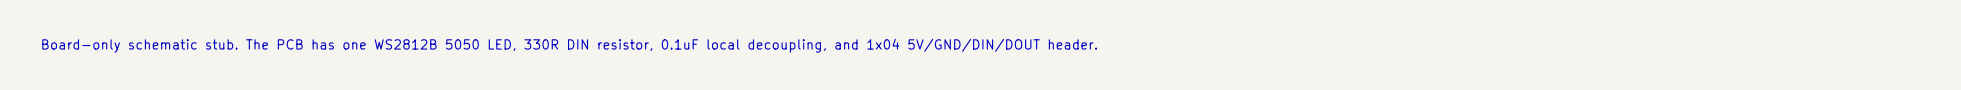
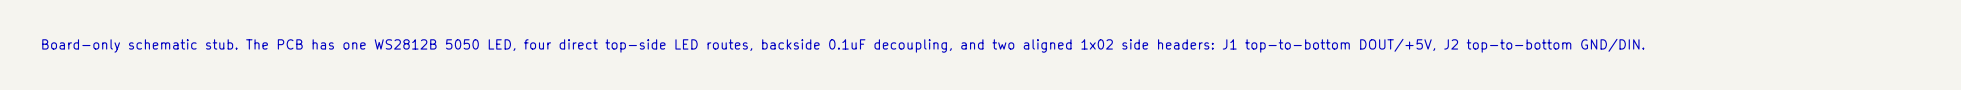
text: Board-only schematic stub. The PCB has one WS2812B 5050 LED, 330R DIN resistor, 0.1uF local decoupling, and 1x04 5V/GND/DIN/DOUT header. (569, 45) -> Board-only schematic stub. The PCB has one WS2812B 5050 LED, four direct top-side LED routes, backside 0.1uF decoupling, and two aligned 1x02 side headers: J1 top-to-bottom DOUT/+5V, J2 top-to-bottom GND/DIN. (843, 45)

